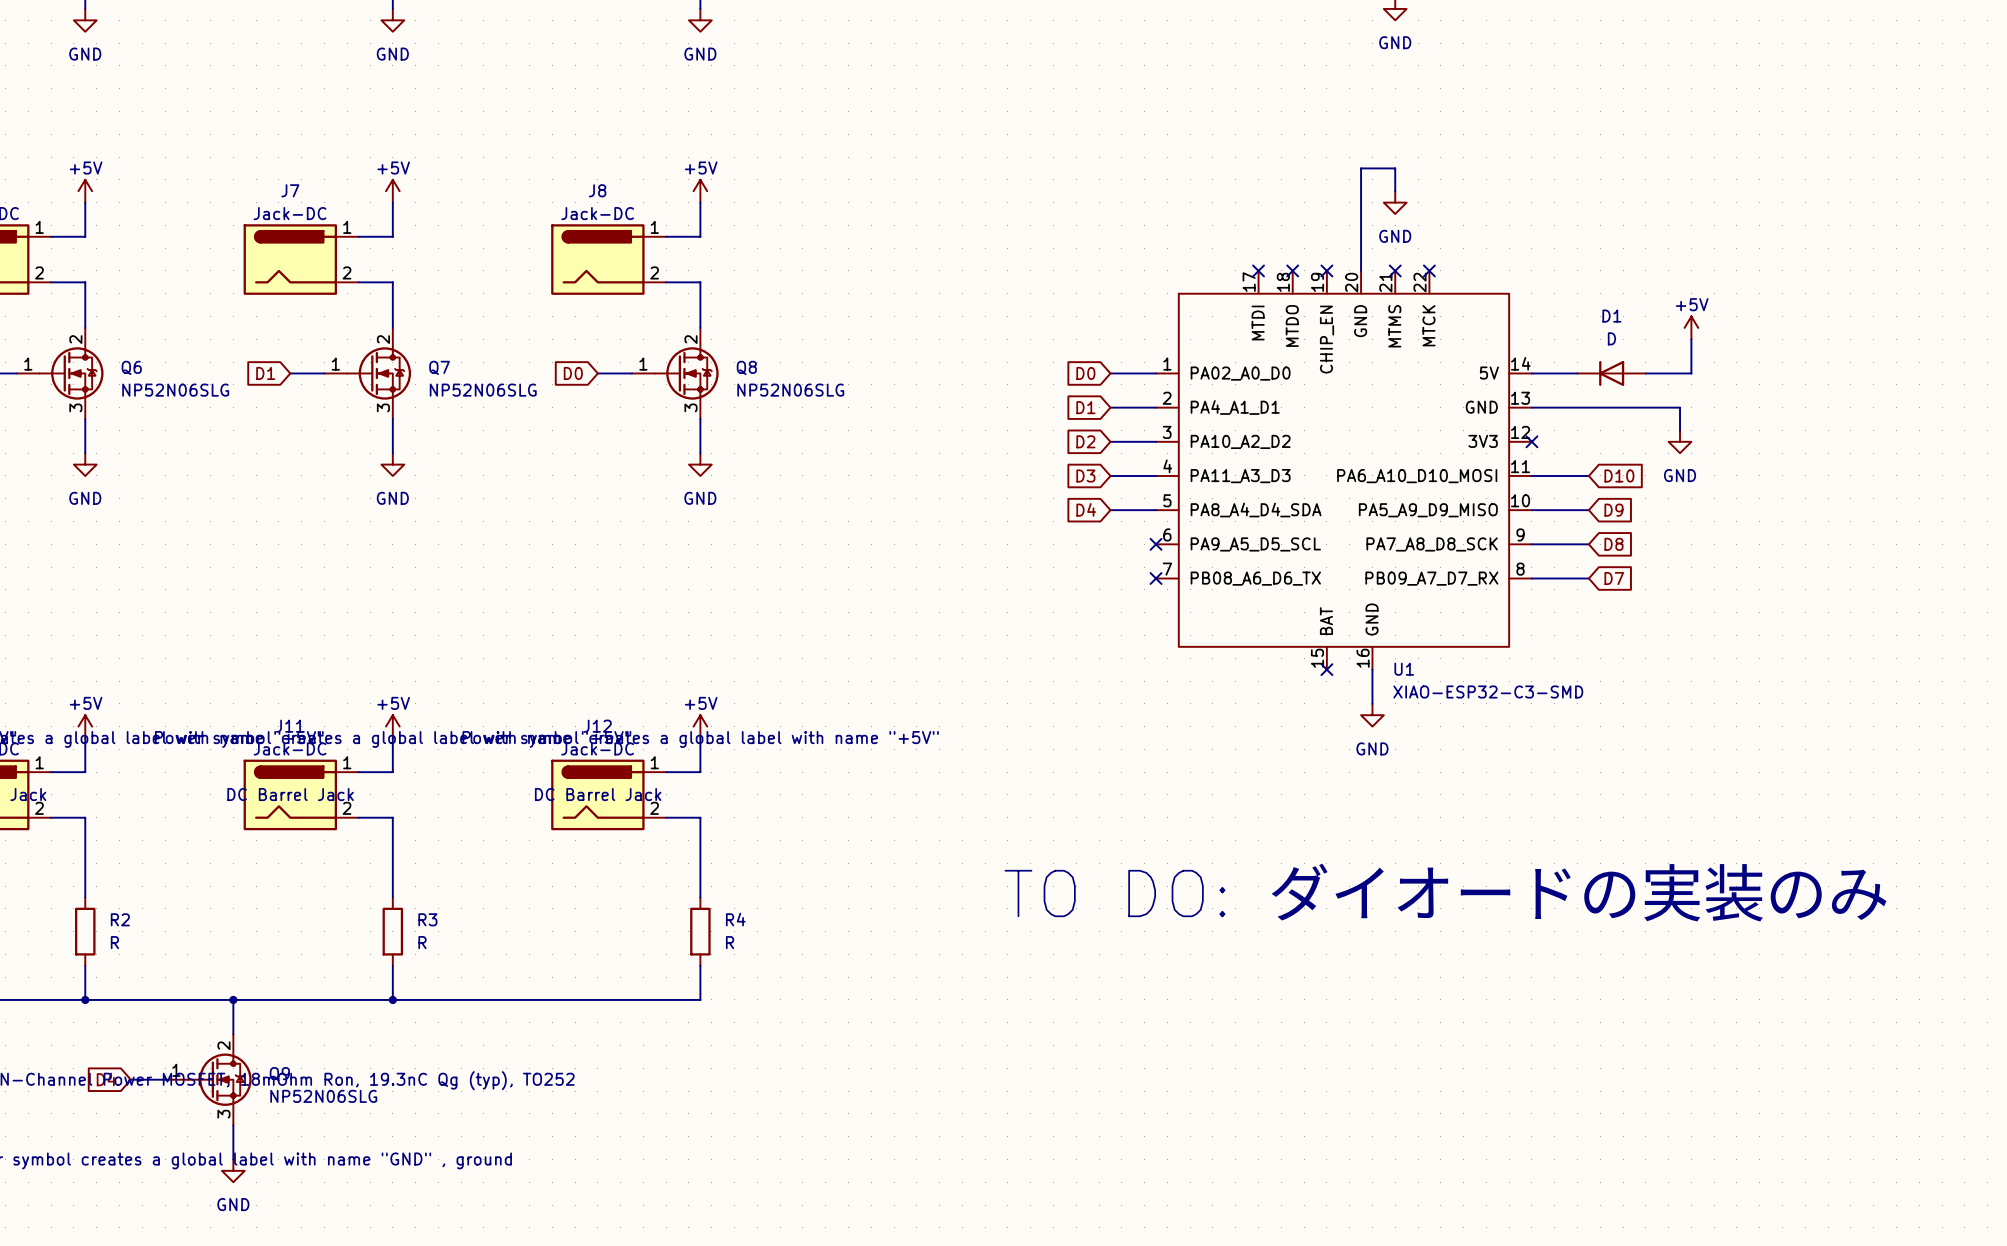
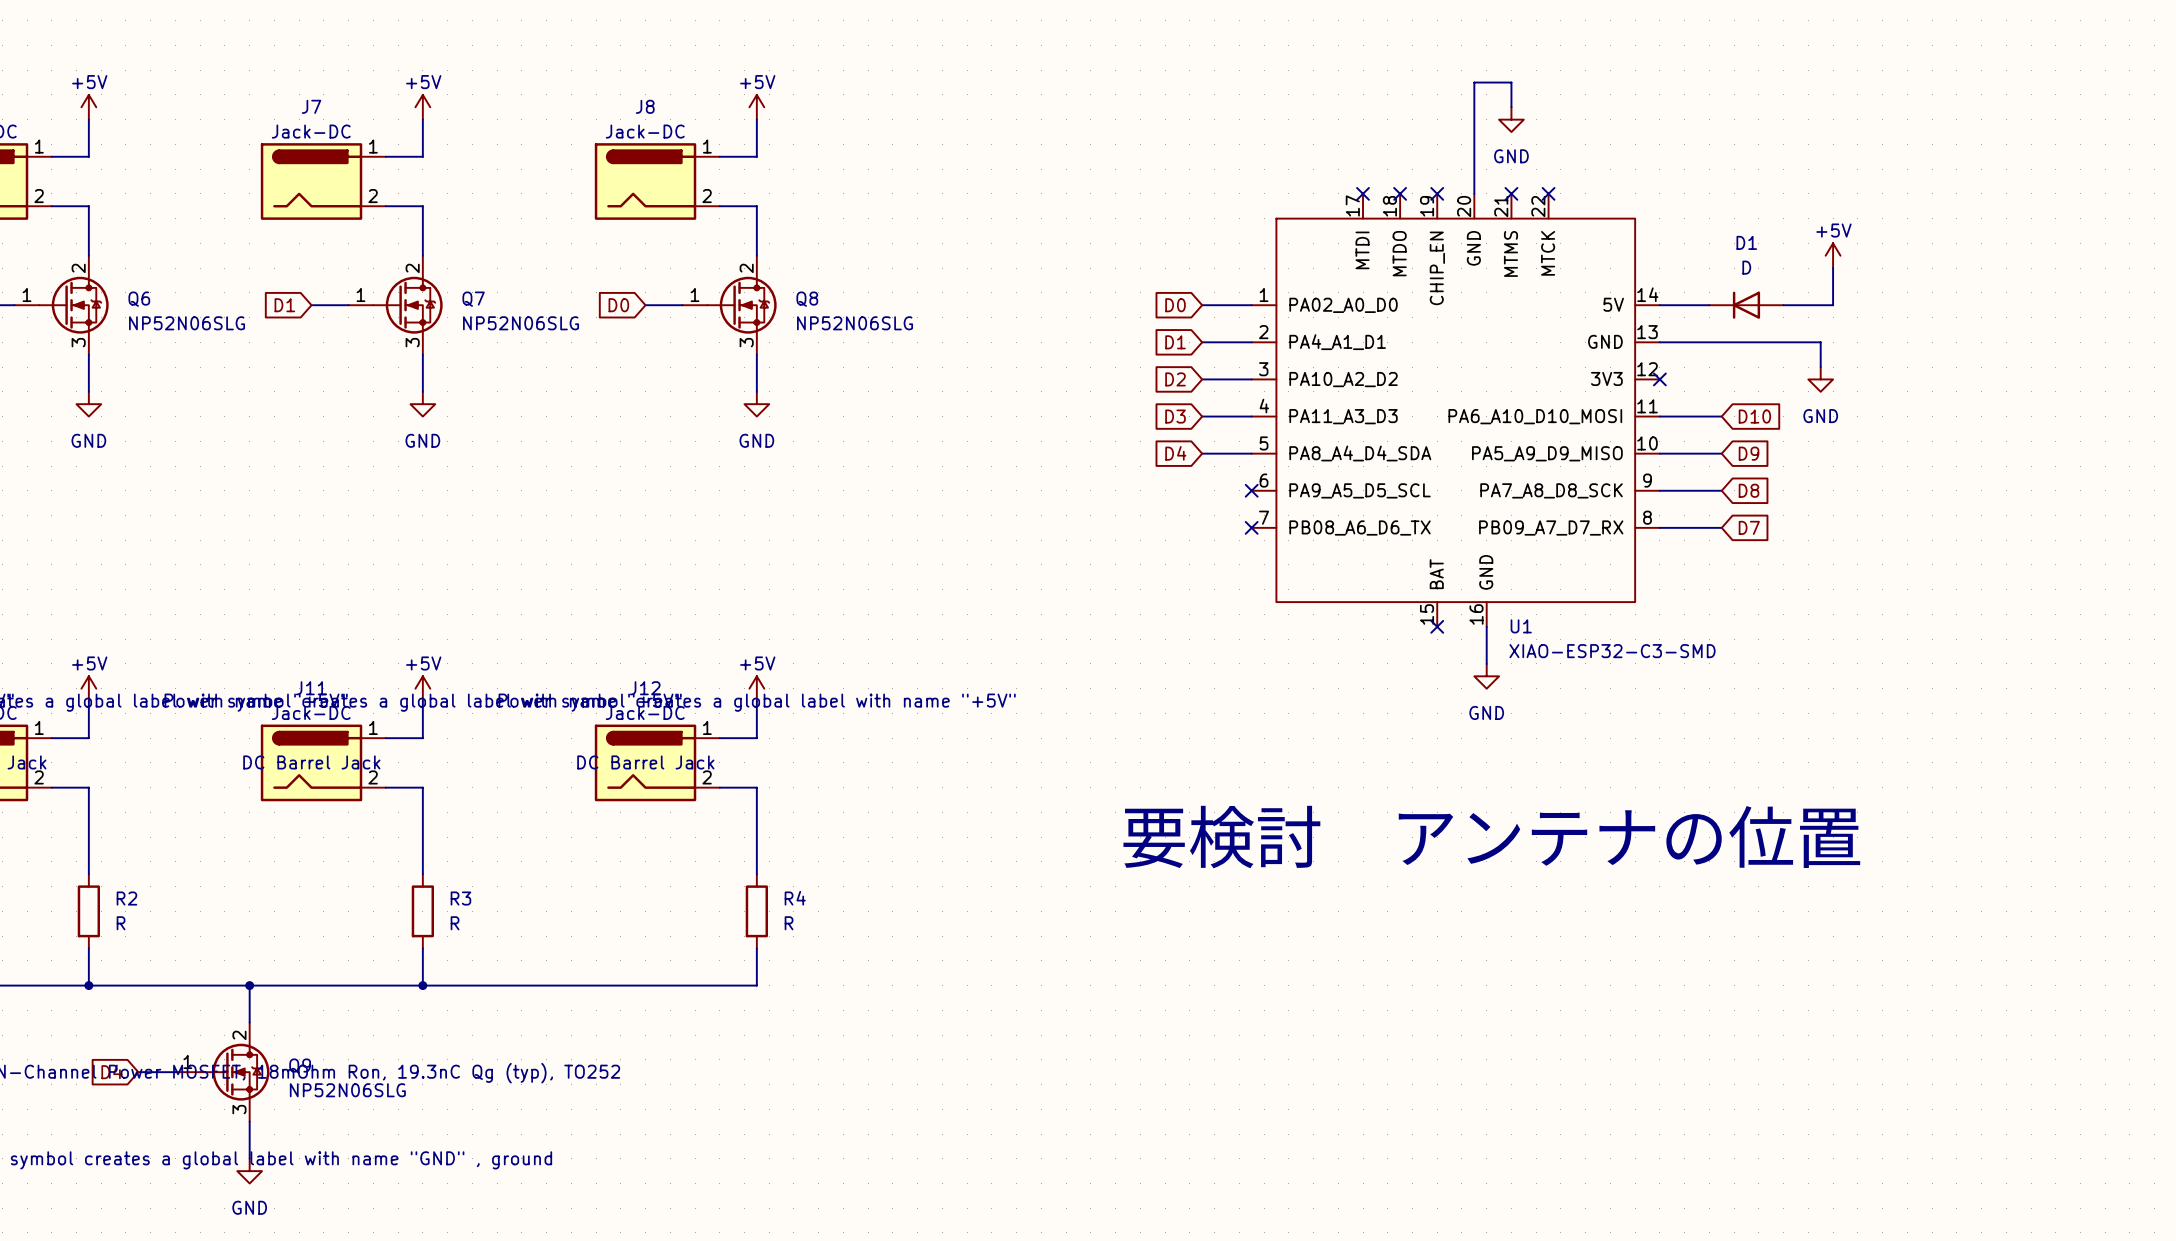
text: none -> 要検討 アンテナの位置 (1491, 837)
text: TO DO: ダイオードの実装のみ (1445, 892) -> none

